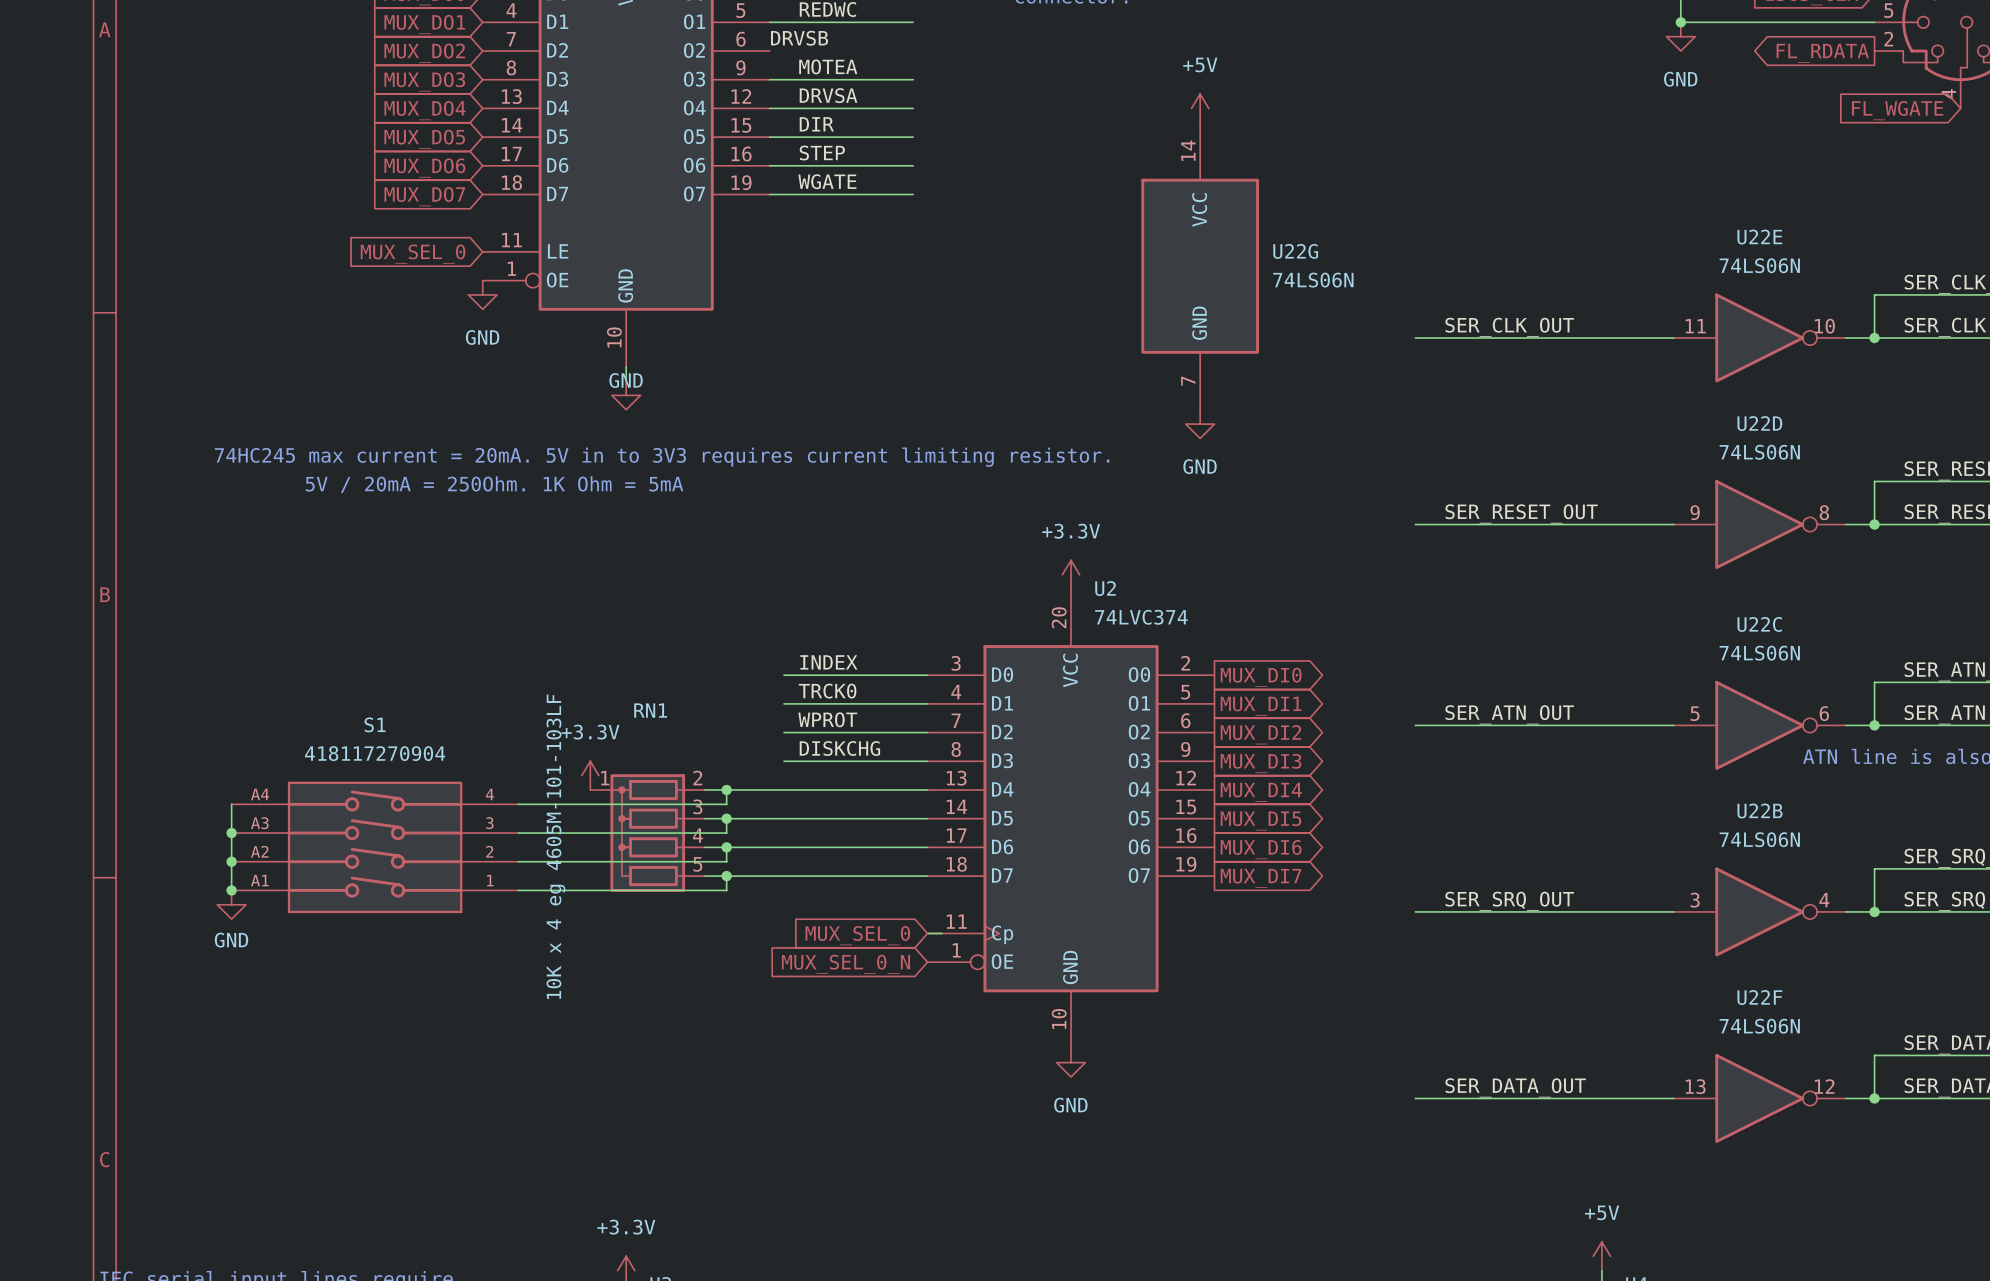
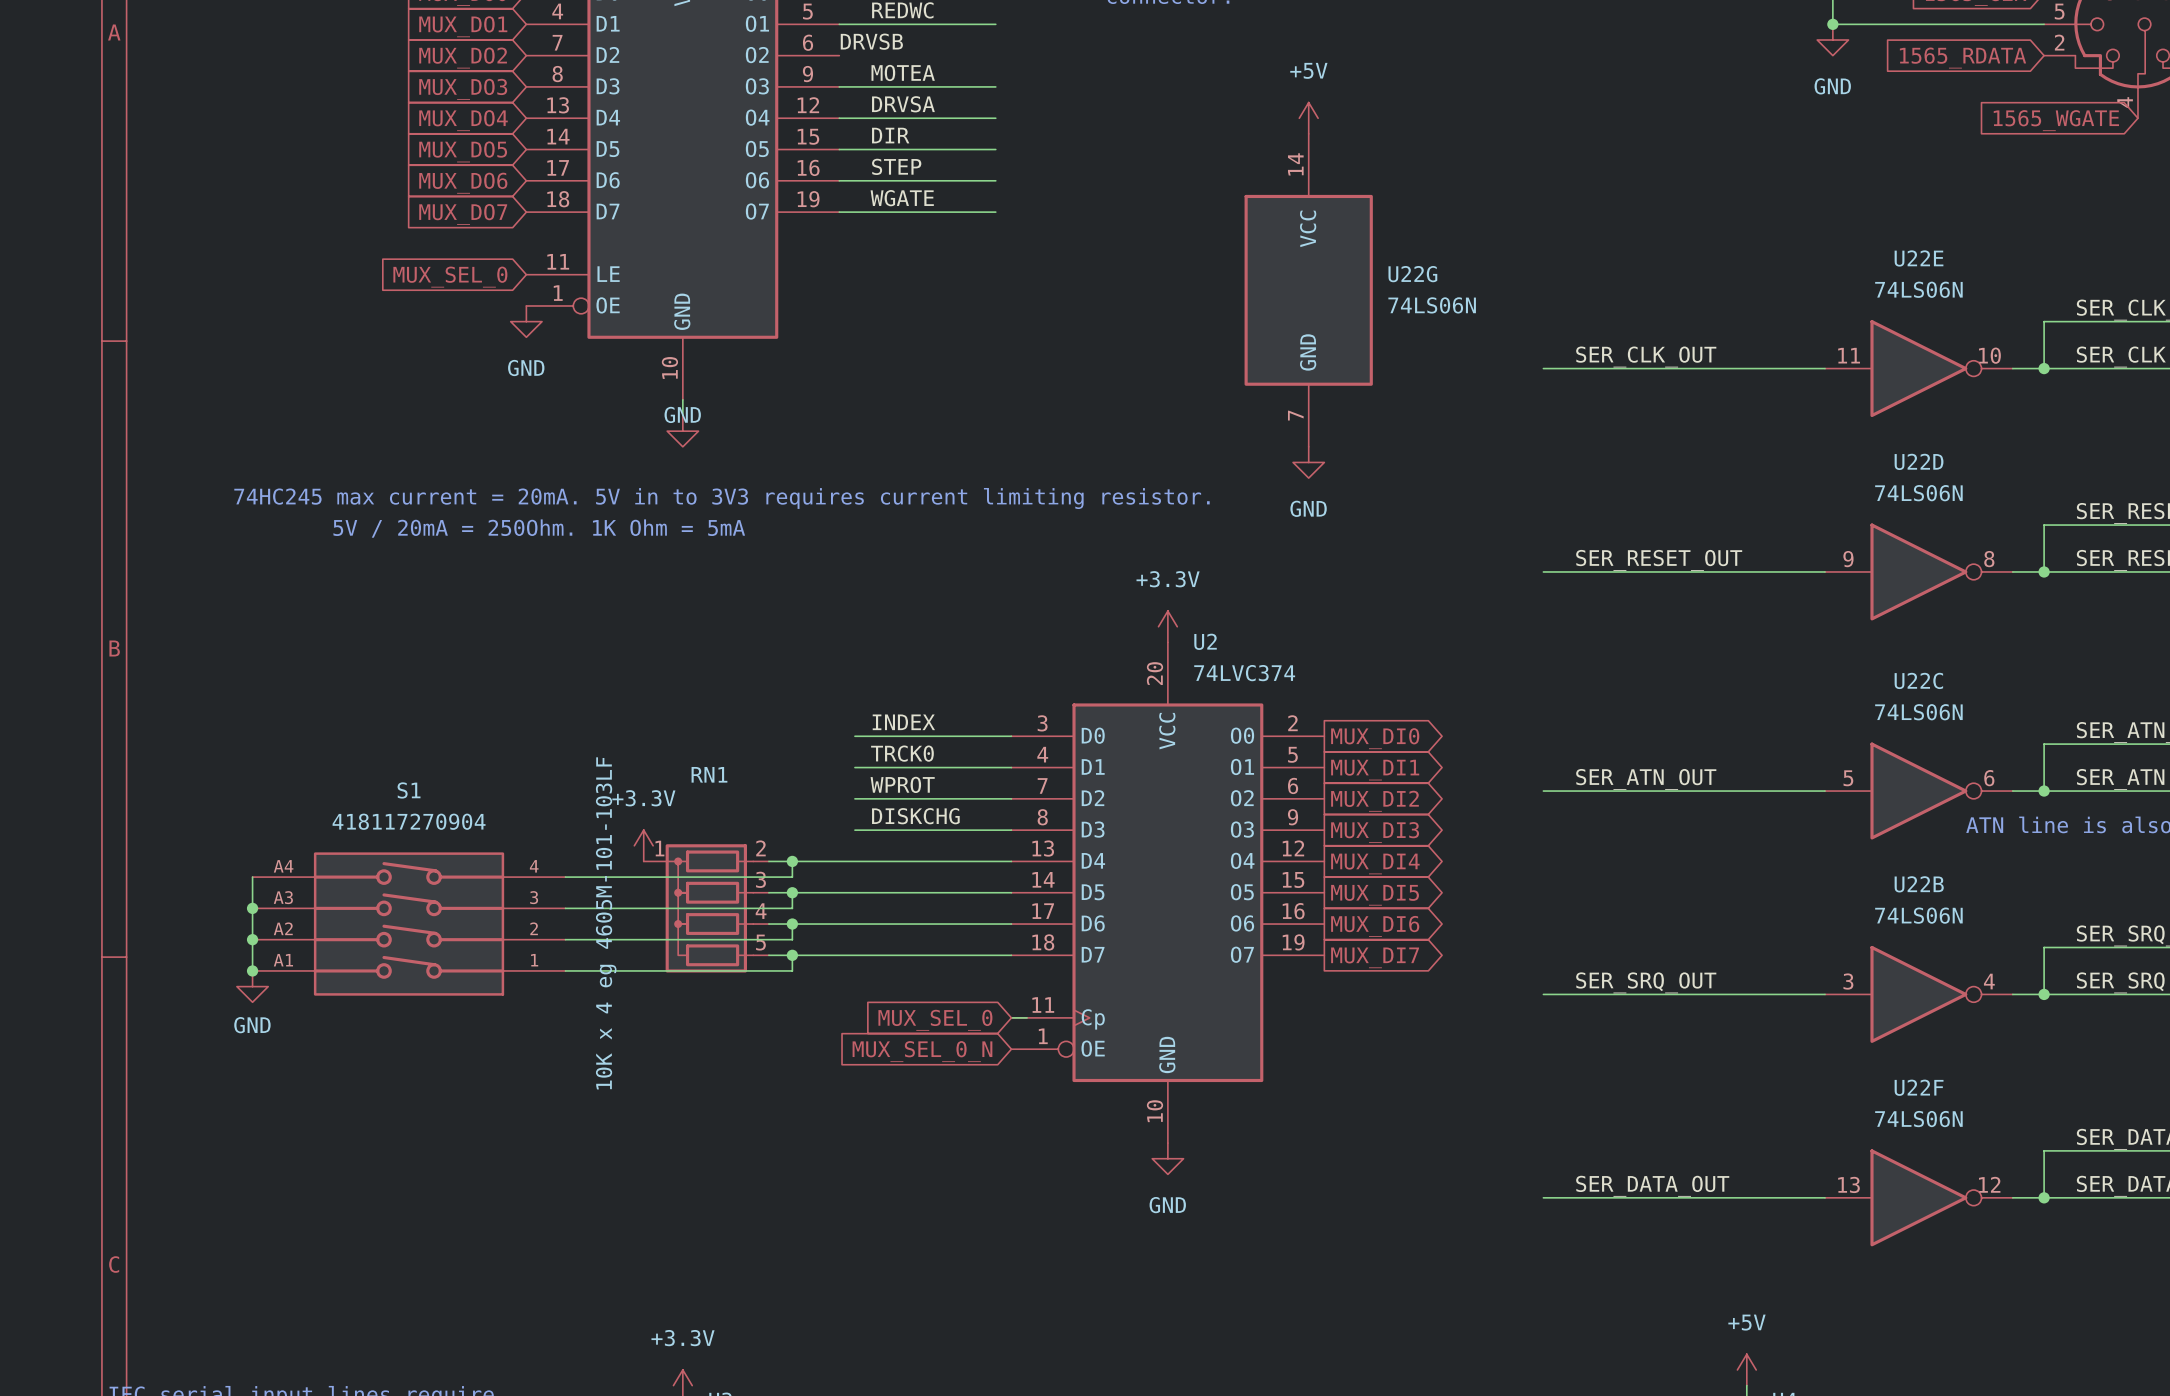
global label shape: output (1822, 53) -> input (1962, 58)
global label: FL_RDATA (1822, 53) -> 1565_RDATA (1962, 58)
global label: FL_WGATE (1897, 110) -> 1565_WGATE (2056, 120)

